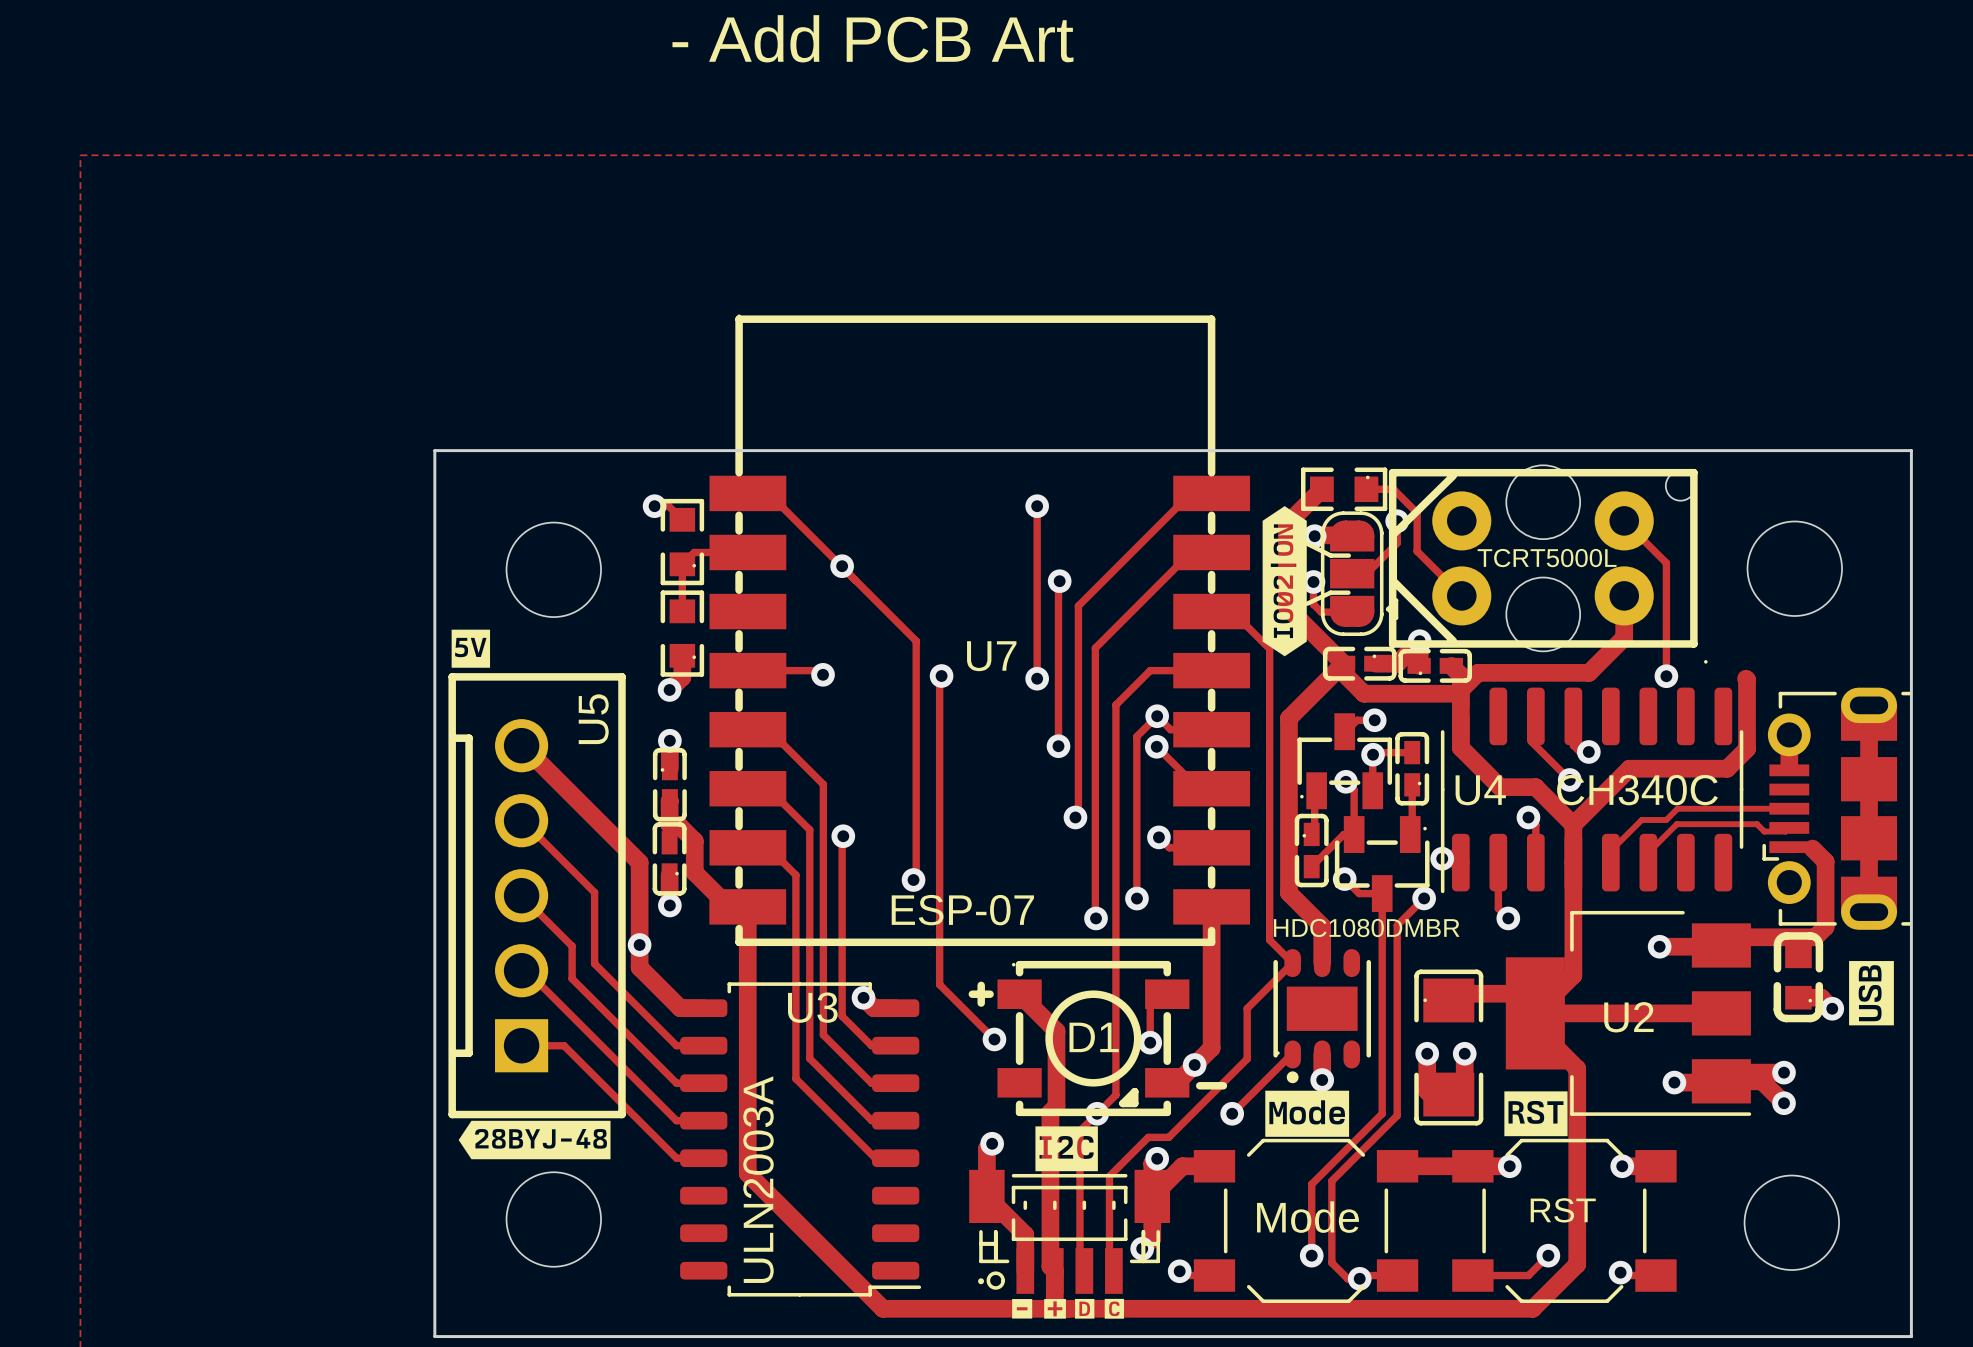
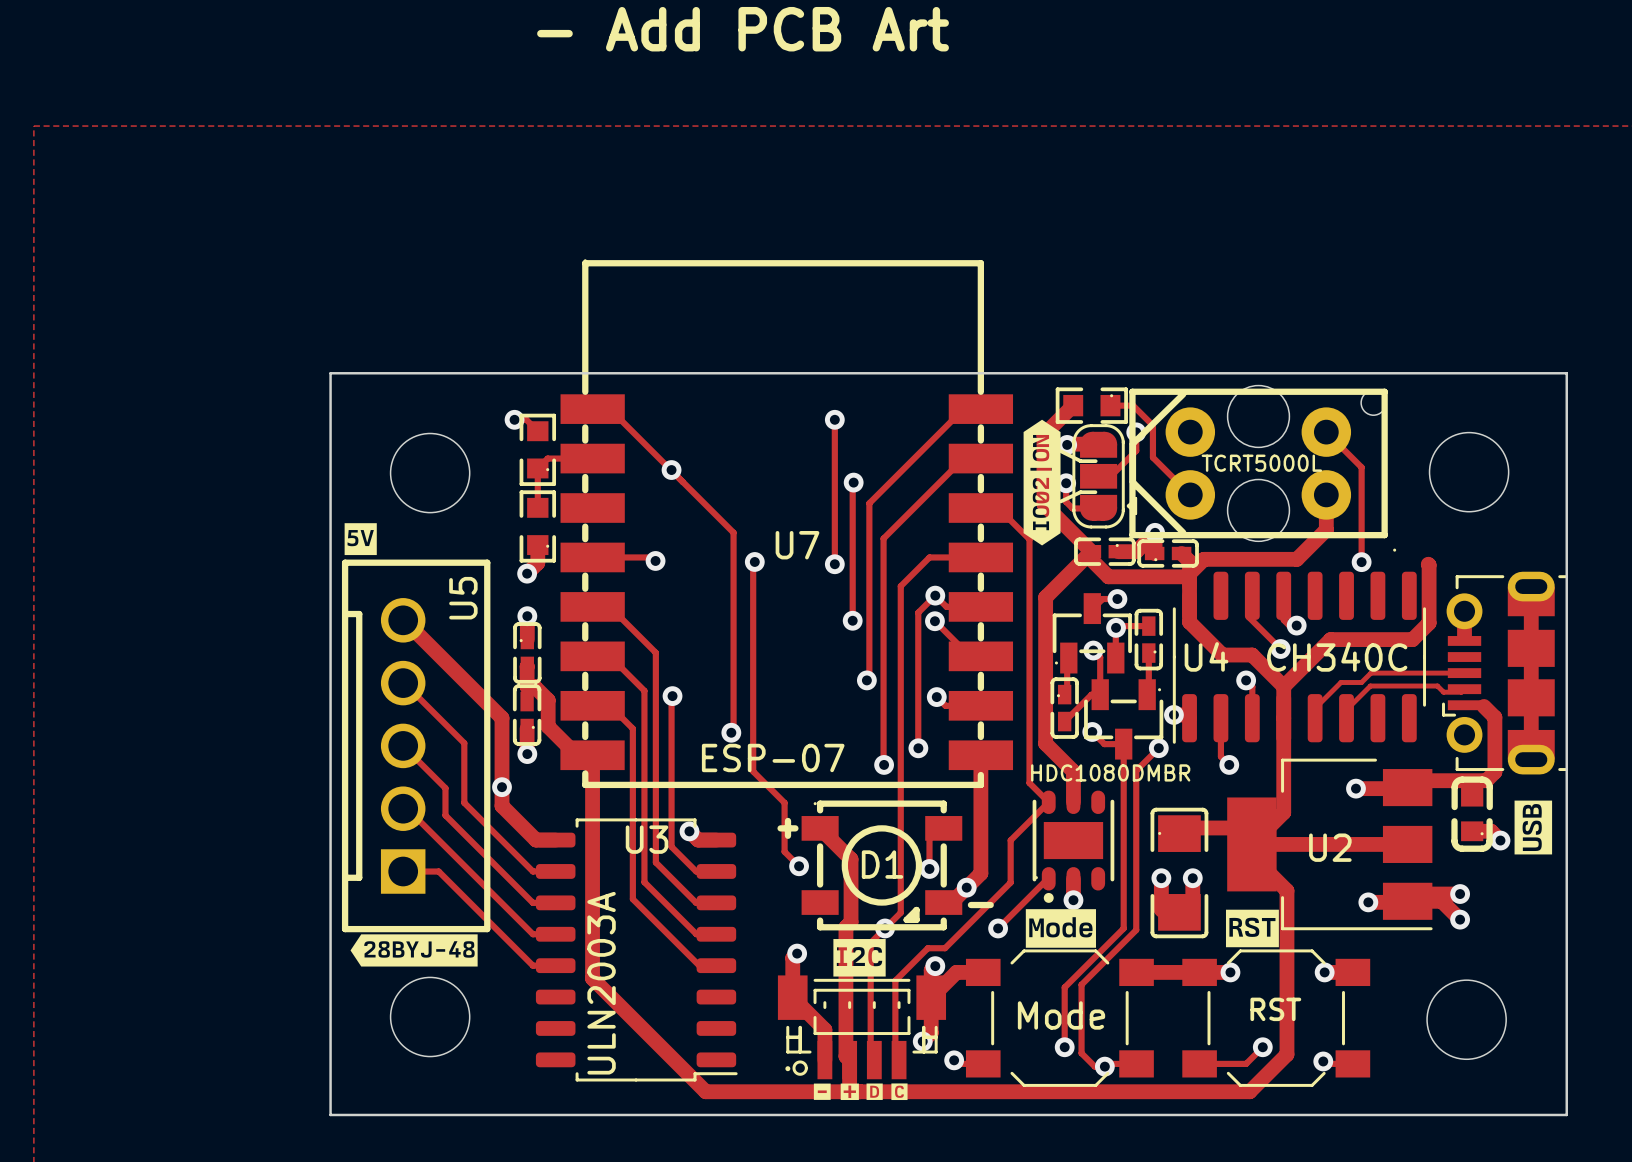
track: (939, 926) (939, 984) (977, 1022) -> (753, 771) (784, 802) (784, 851)

